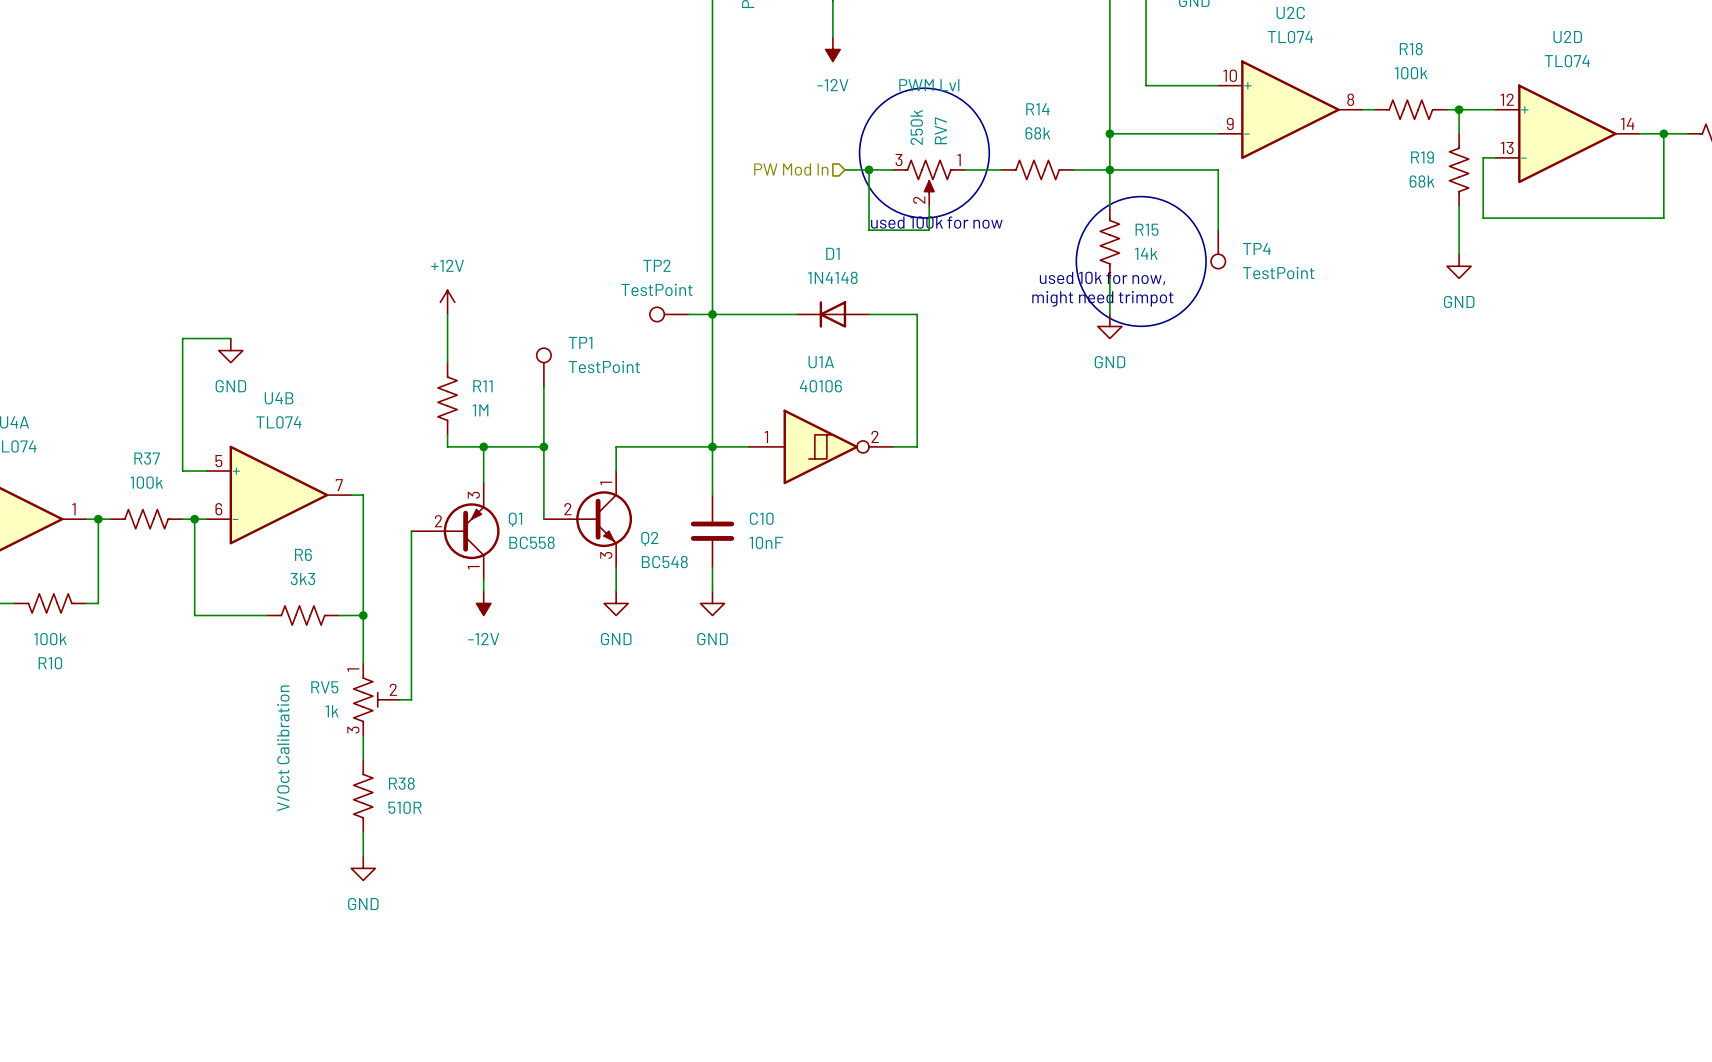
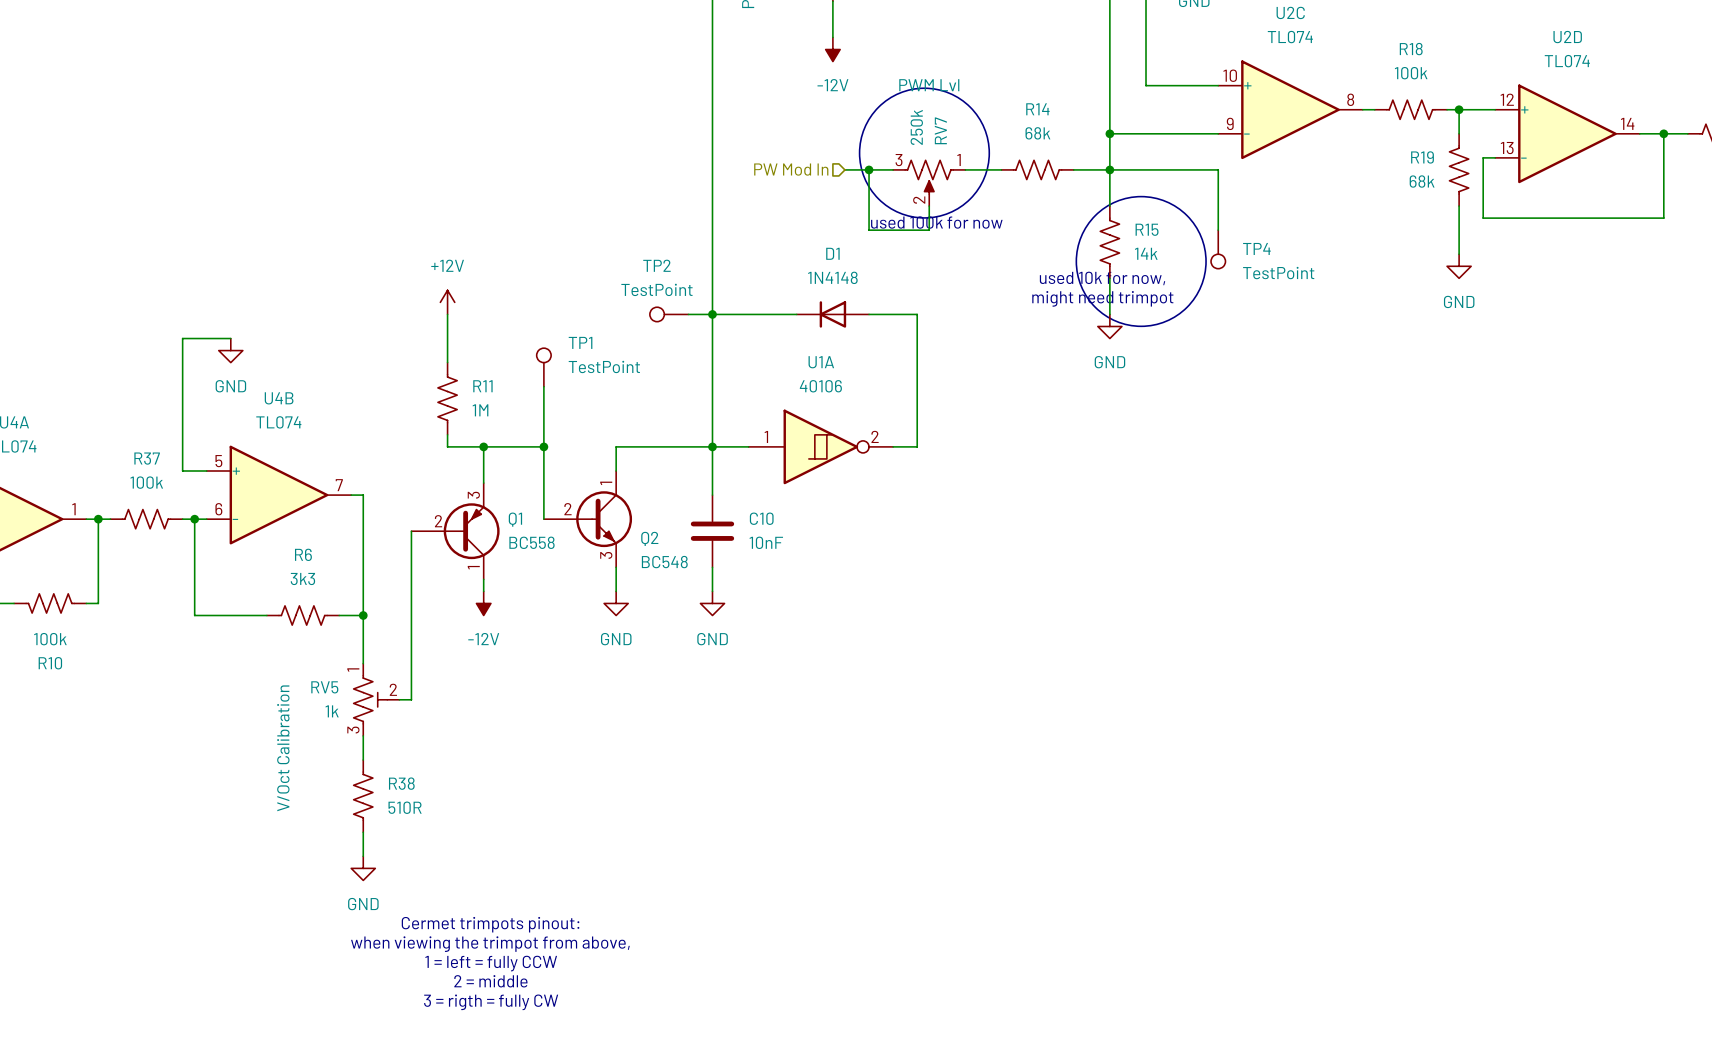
text: none -> Cermet trimpots pinout: (490, 924)
text: none -> when viewing the trimpot from above, (490, 944)
text: none -> 1 = left = fully CCW (491, 963)
text: none -> 2 = middle (490, 981)
text: none -> 3 = rigth = fully CW (491, 1002)

